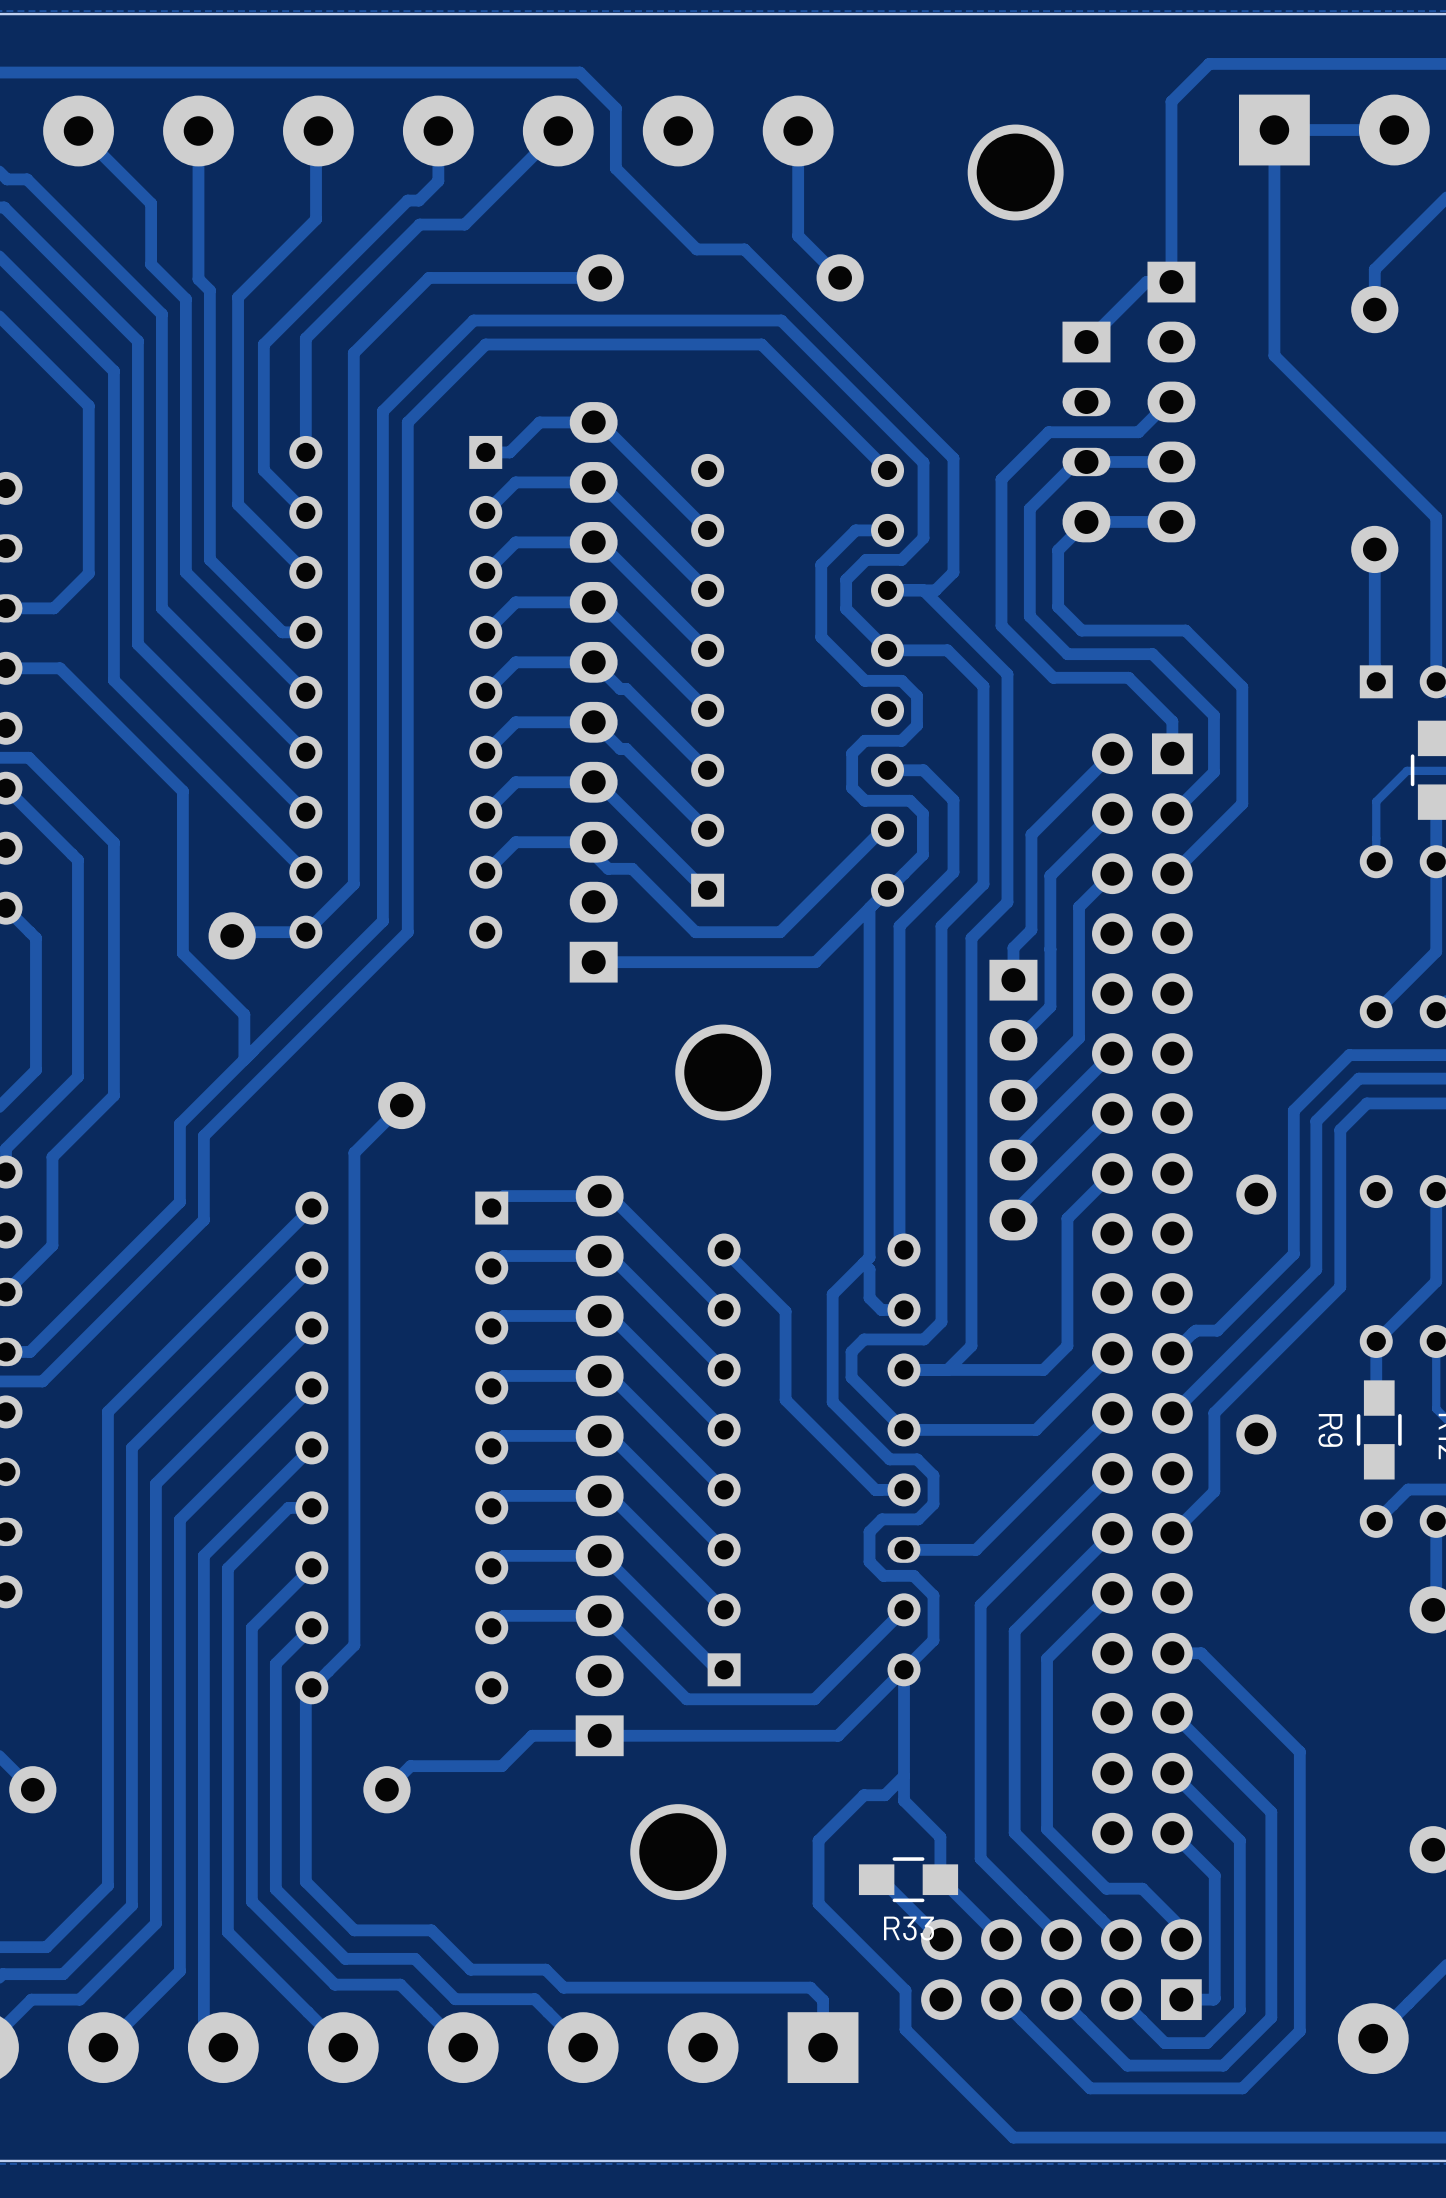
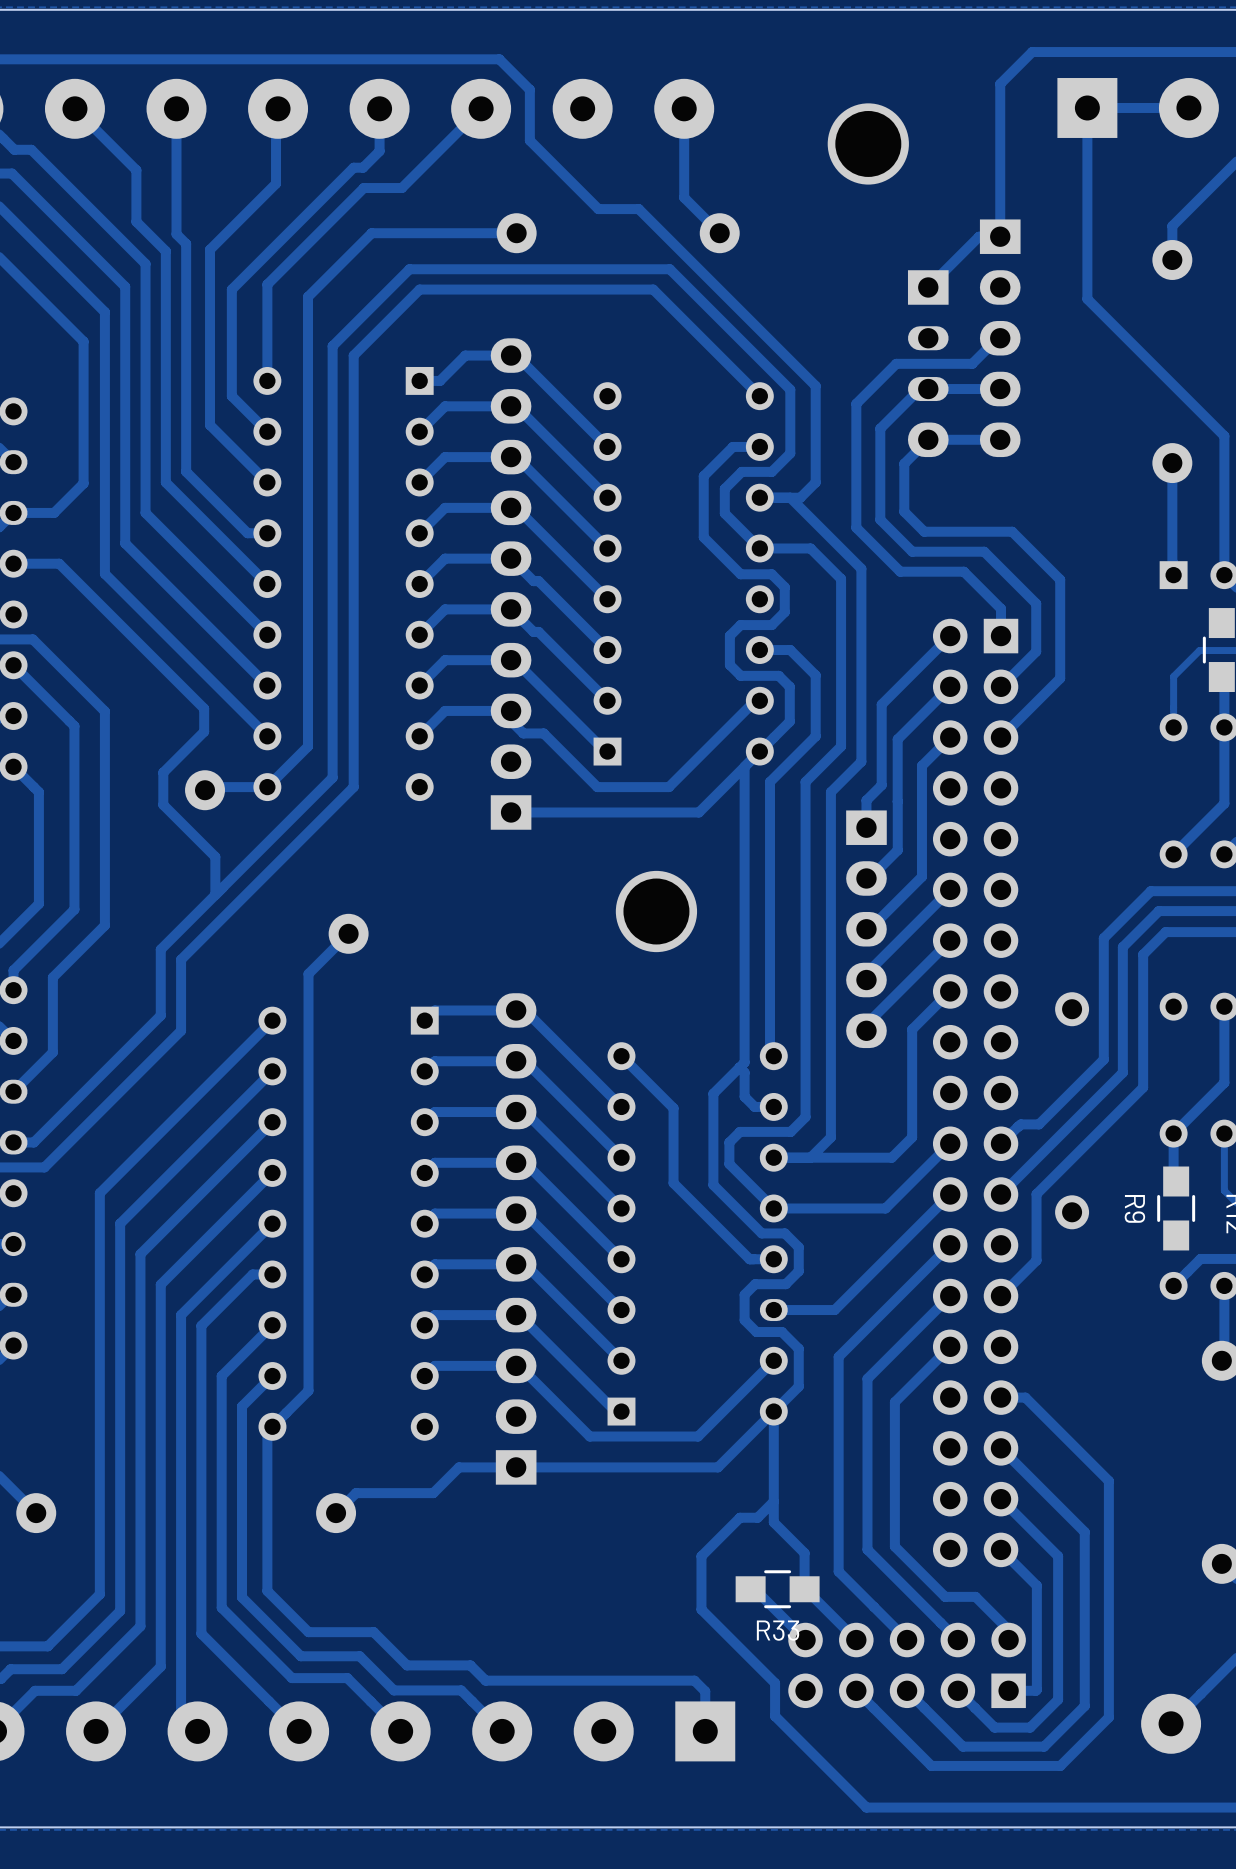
track: (182, 791) (182, 915) -> (163, 667) (204, 708) (204, 731) (163, 772)
part position: (723, 1072) -> (656, 911)
part: (678, 1852) -> none

